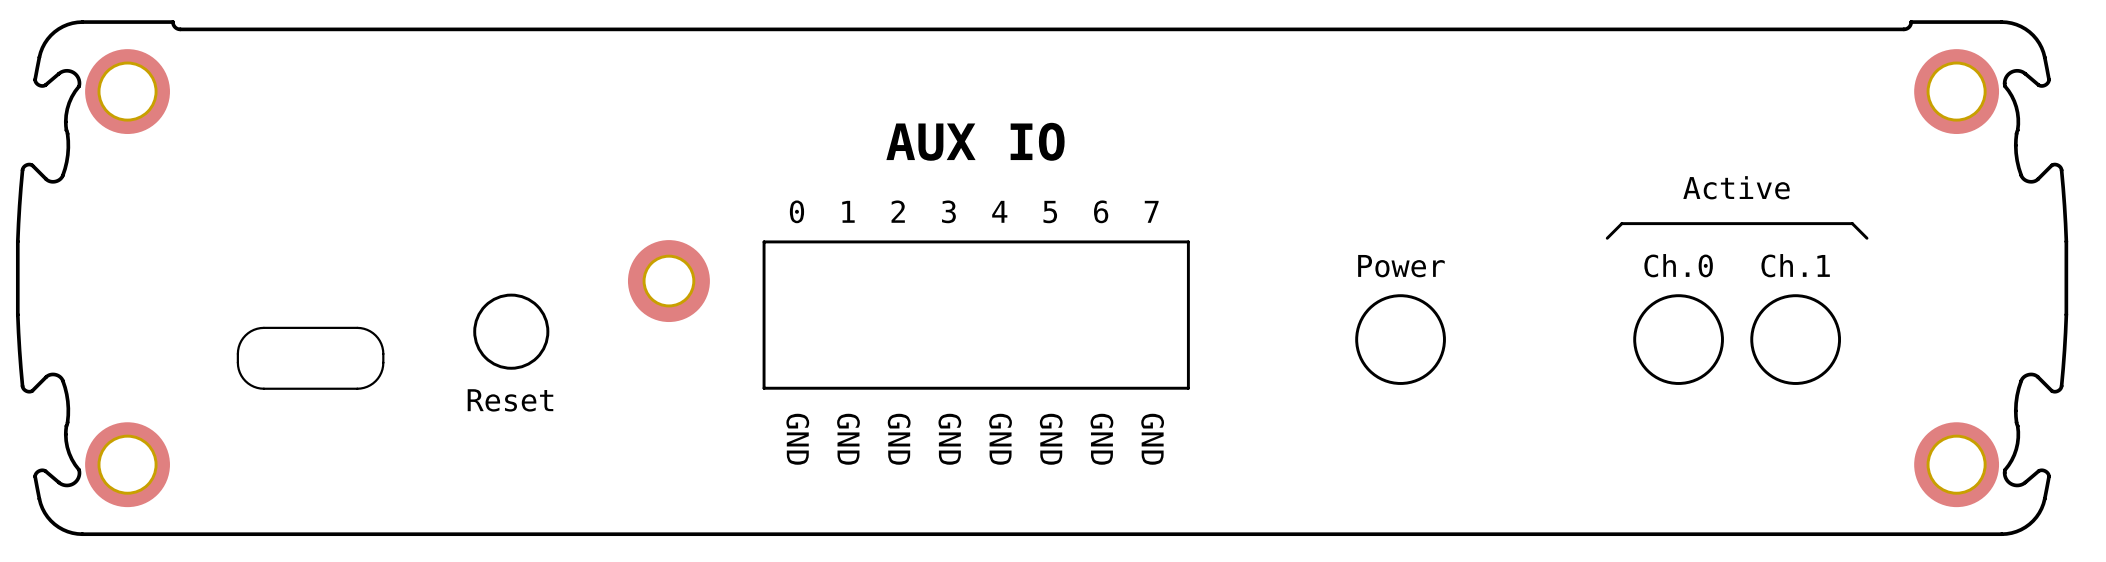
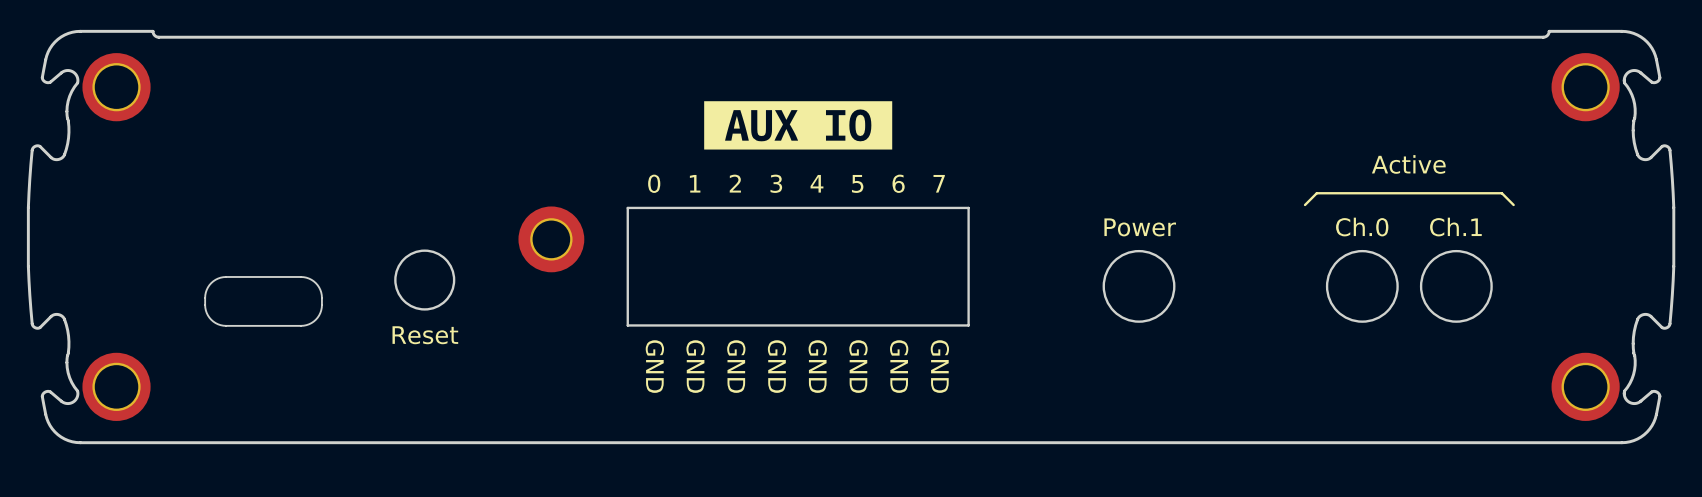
drawing: none -> [704, 101, 893, 150]
text: AUX IO (975, 141) -> none

